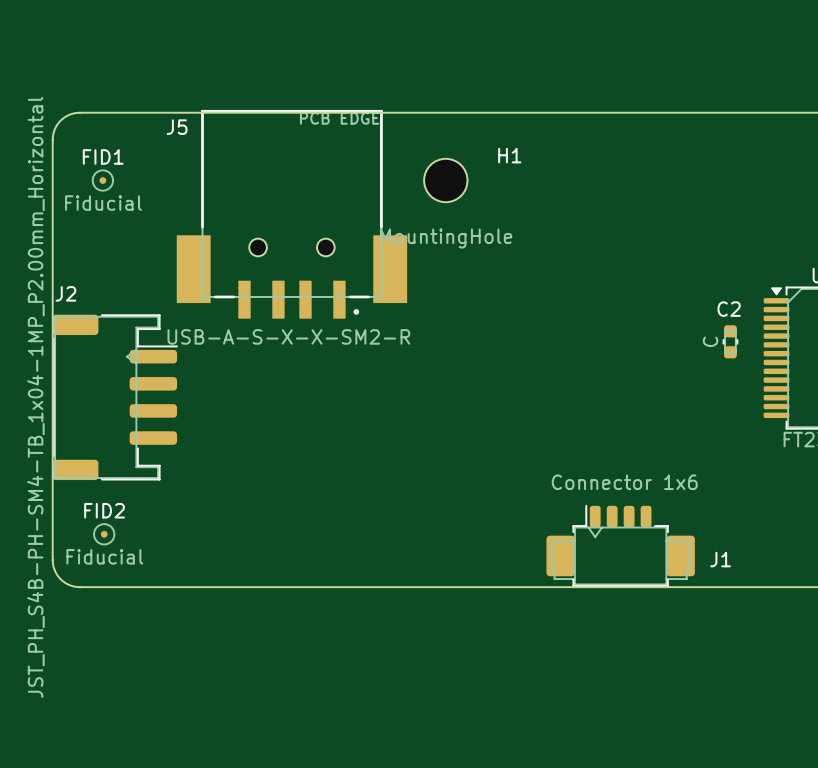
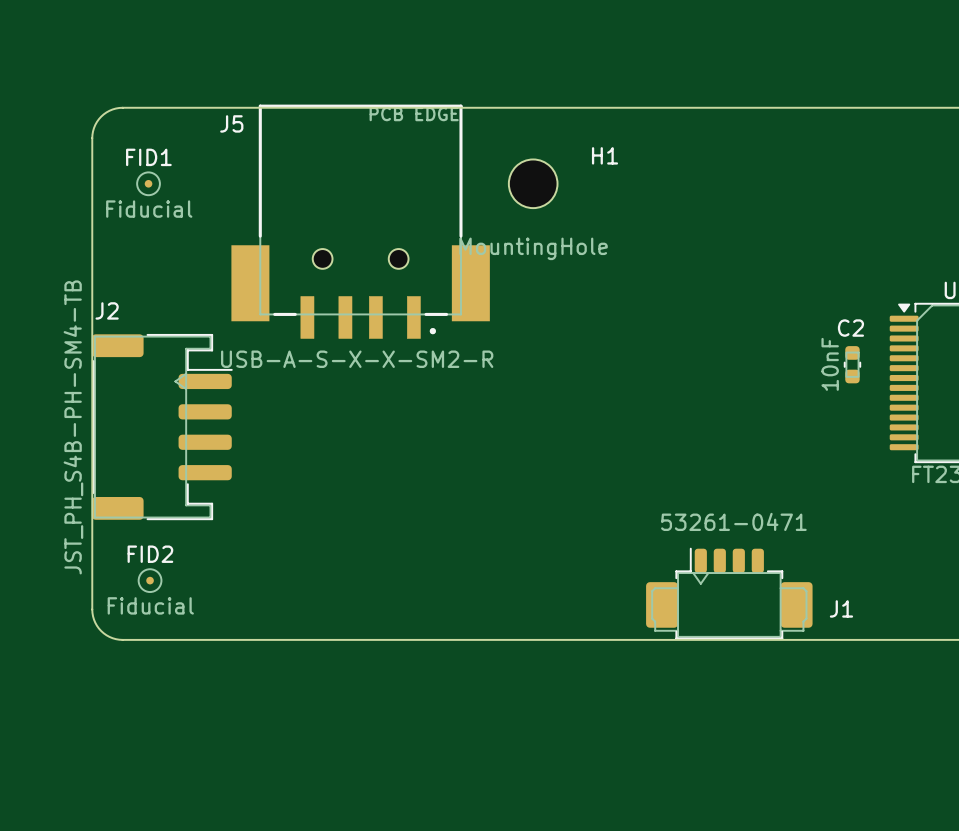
C2 value: C (710, 341) -> 10nF (830, 364)
J2 value: JST_PH_S4B-PH-SM4-TB_1x04-1MP_P2.00mm_Horizontal (35, 397) -> JST_PH_S4B-PH-SM4-TB (73, 427)
J1 value: Connector 1x6 (624, 482) -> 53261-0471 (733, 521)

